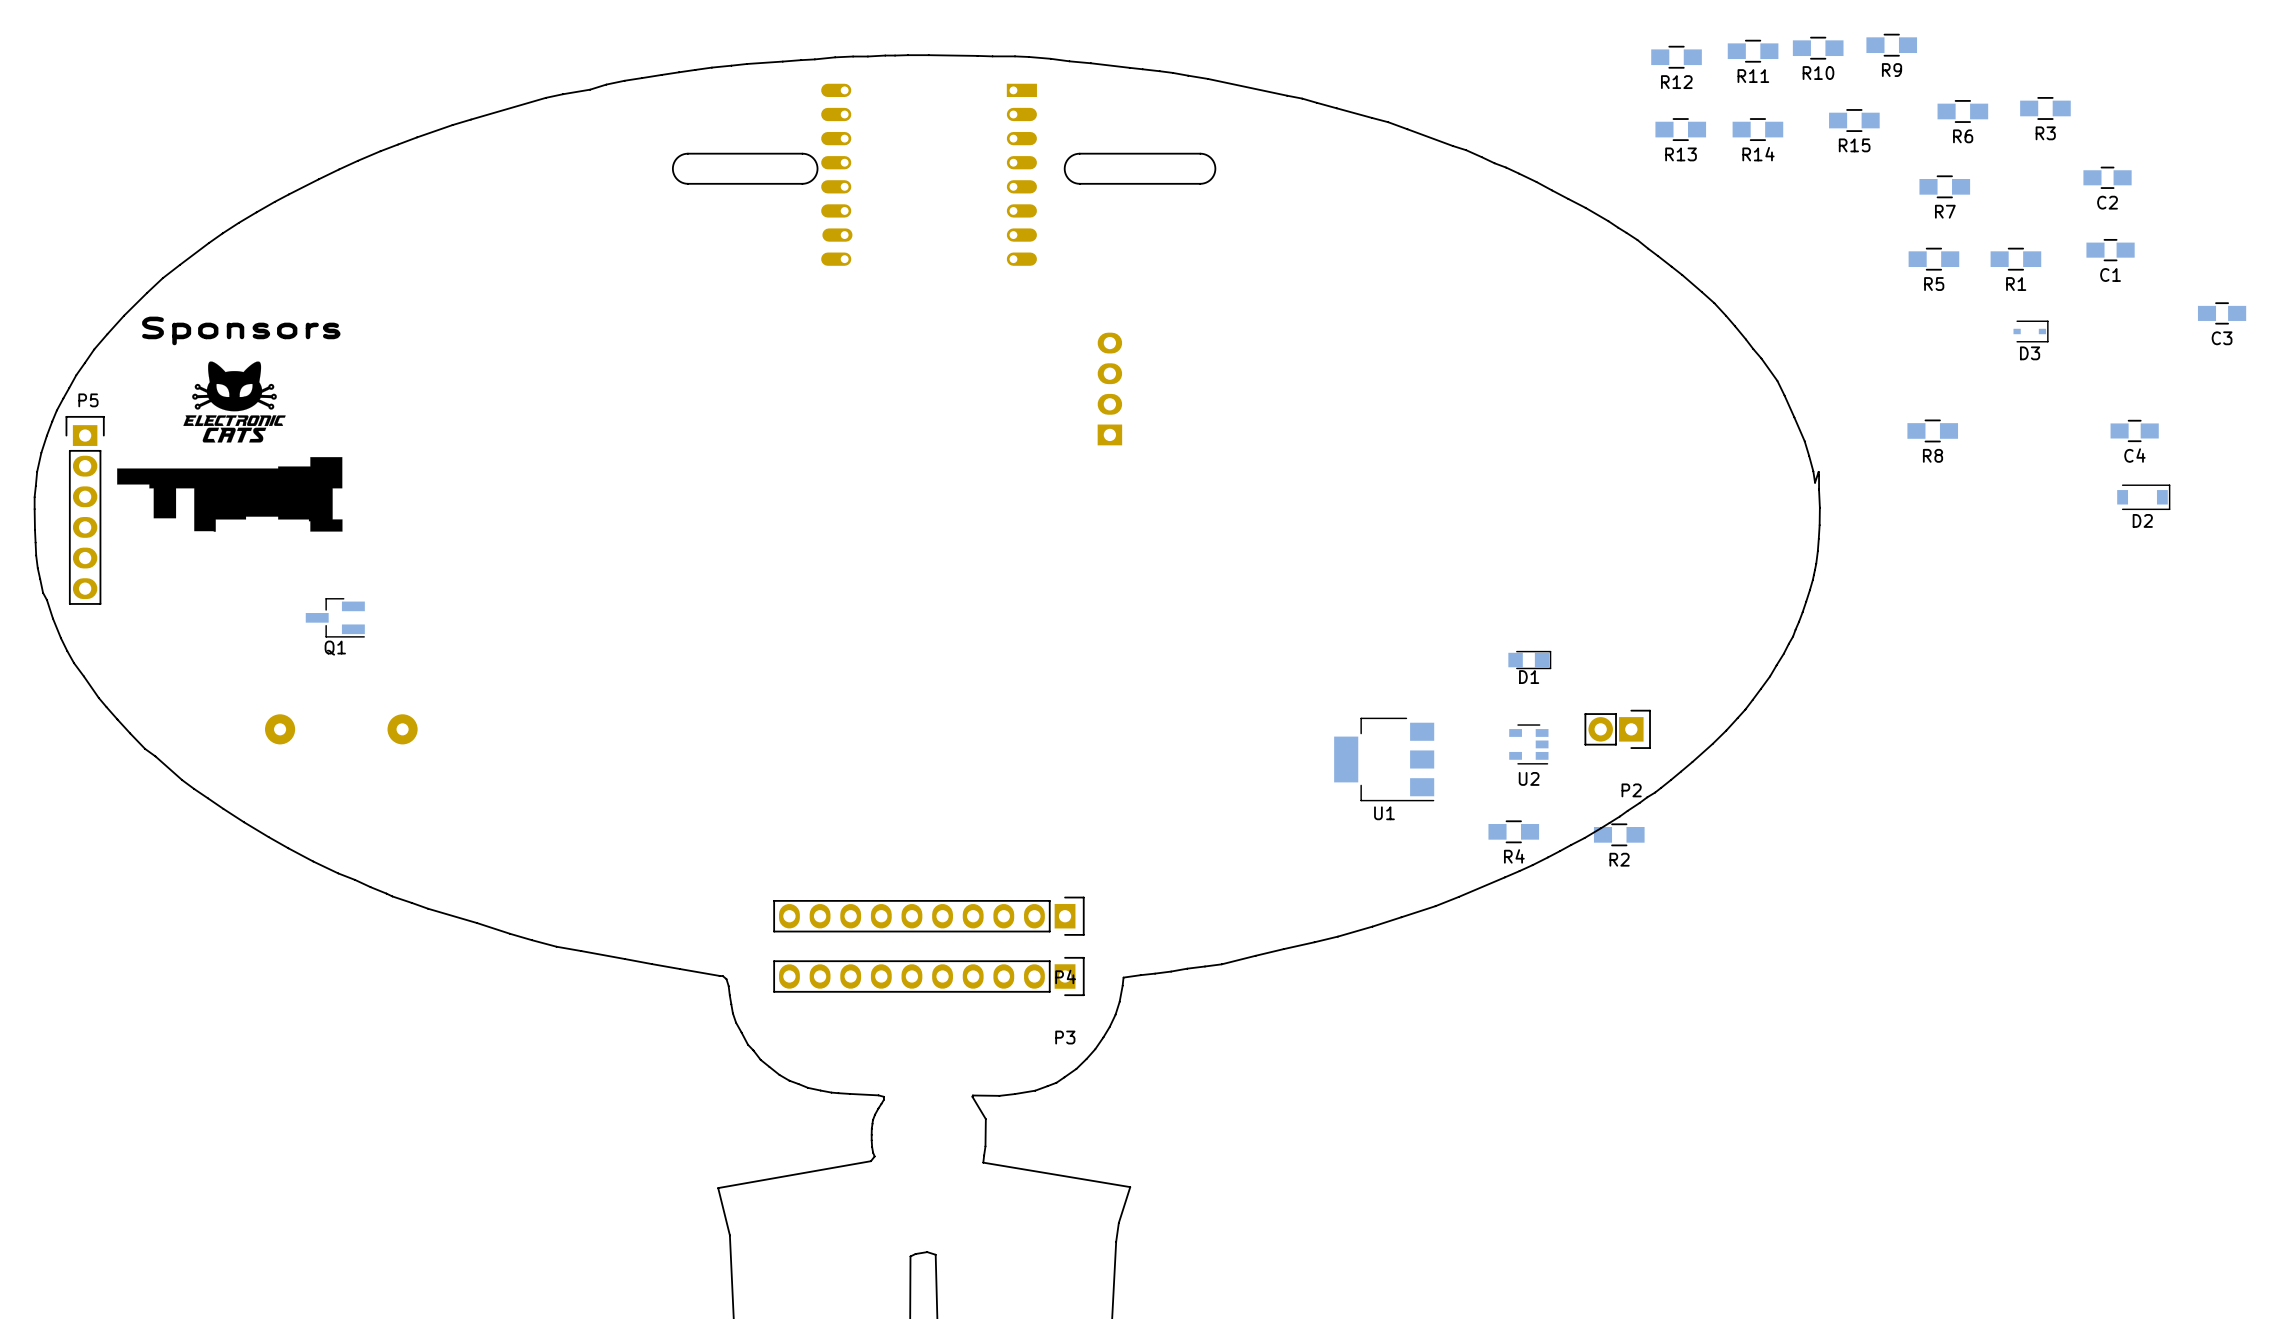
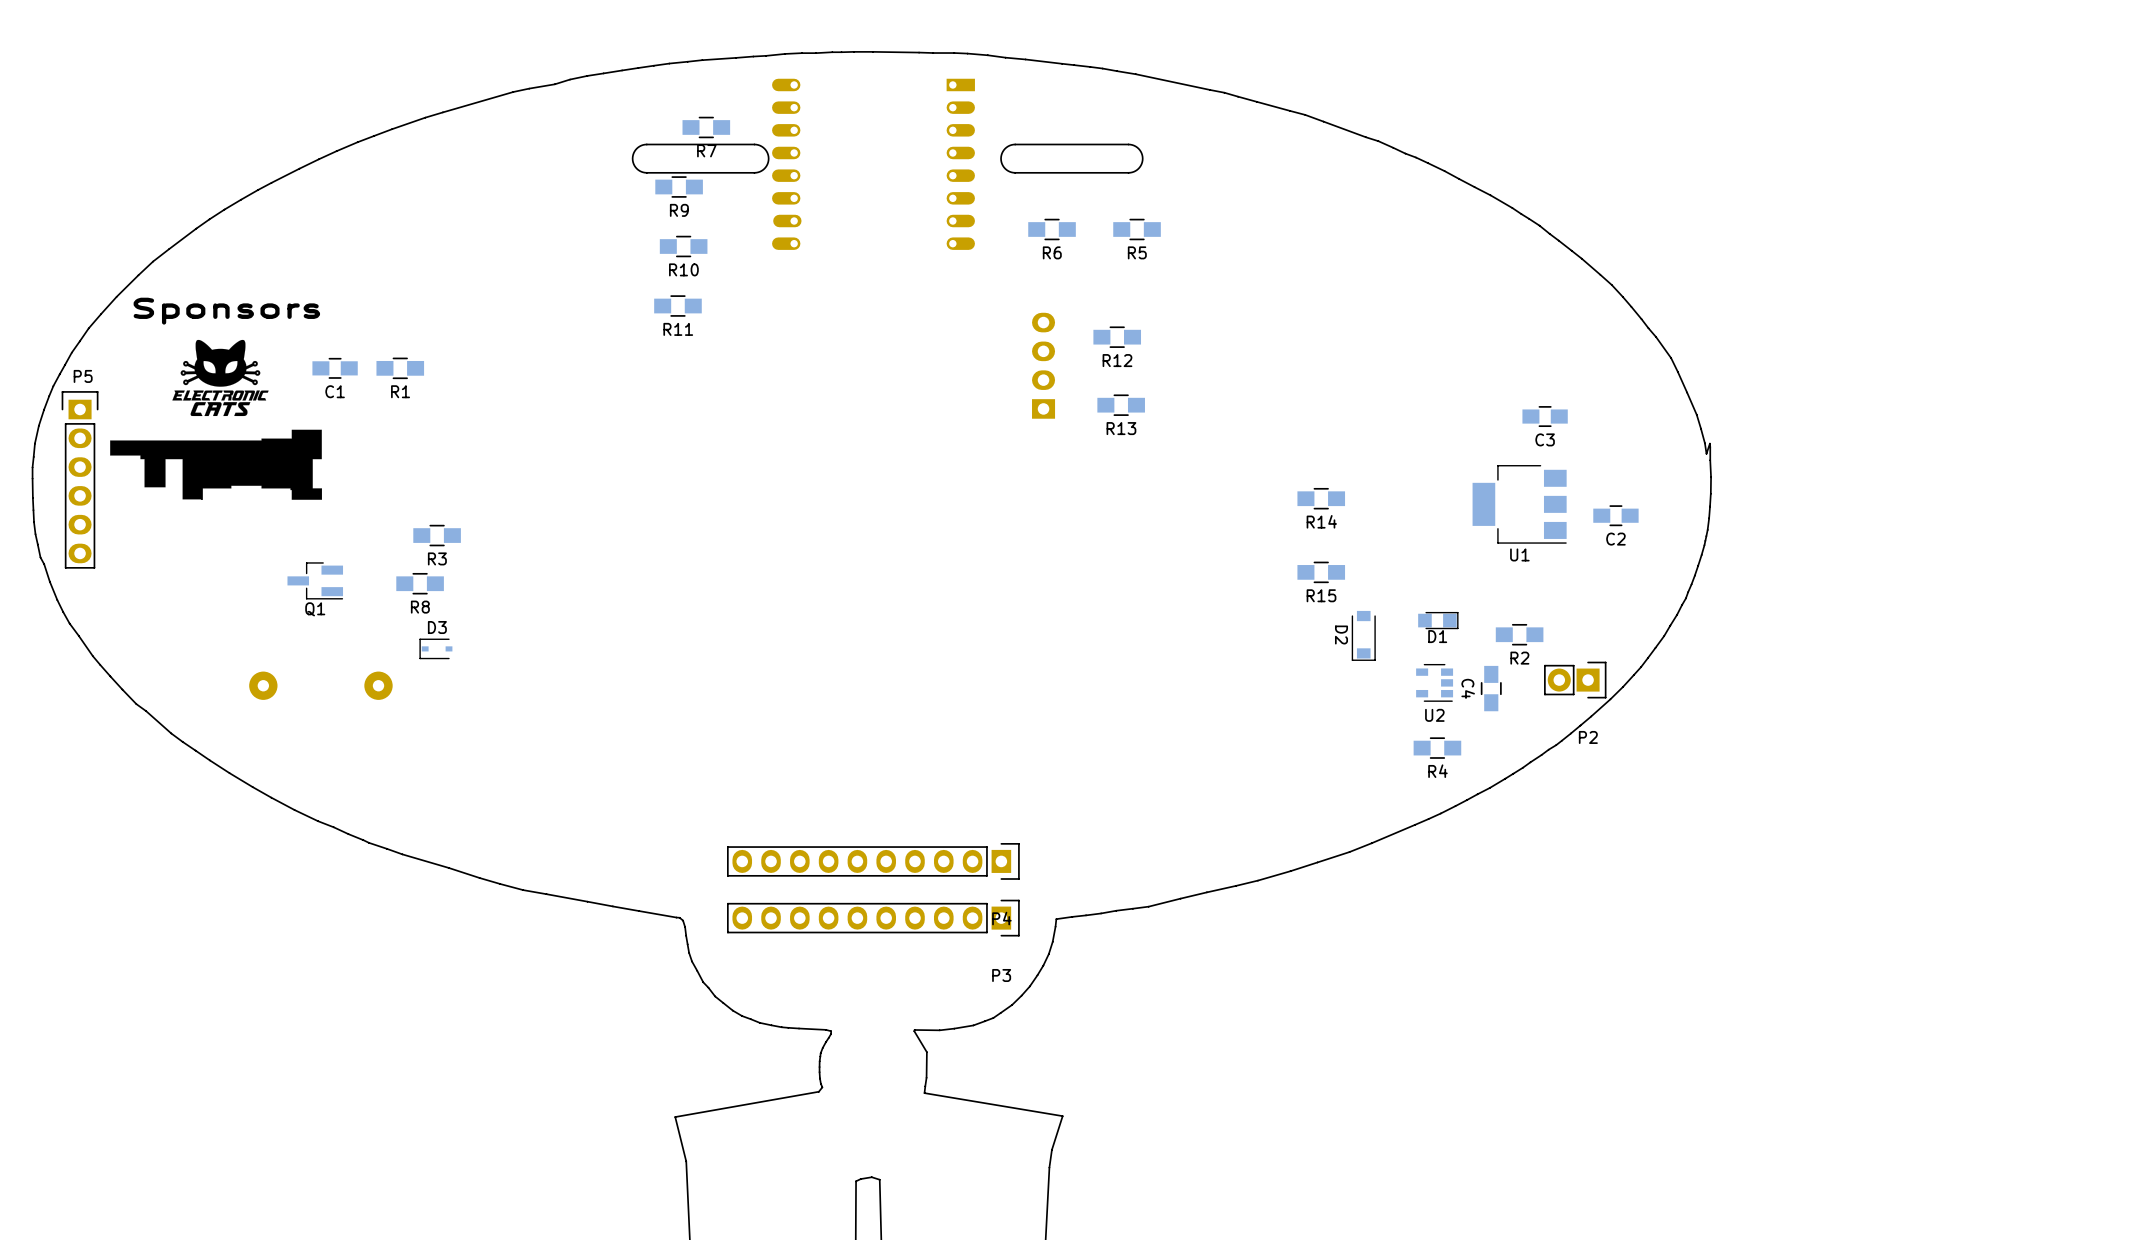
R9 position: (1891, 45) -> (679, 186)
R10 position: (1818, 48) -> (683, 246)
R11 position: (1753, 51) -> (677, 306)
R12 position: (1676, 57) -> (1117, 337)
R3 position: (2045, 108) -> (437, 535)
R6 position: (1962, 111) -> (1052, 229)
R15 position: (1854, 120) -> (1321, 572)
R13 position: (1680, 129) -> (1121, 405)
R14 position: (1757, 129) -> (1321, 498)
C2 position: (2107, 177) -> (1615, 515)
R7 position: (1944, 186) -> (706, 127)
C1 position: (2110, 250) -> (335, 368)
R5 position: (1933, 259) -> (1137, 229)
R1 position: (2015, 259) -> (400, 368)
C3 position: (2222, 313) -> (1545, 416)
D3 rotation: 0° (2031, 331) -> 180° (435, 648)
D3 position: (2031, 331) -> (435, 648)
R8 position: (1932, 430) -> (420, 583)
C4 rotation: 0° (2134, 430) -> 90° clockwise (1491, 688)
C4 position: (2134, 430) -> (1491, 688)
D2 rotation: 0° (2143, 497) -> 90° clockwise (1363, 635)
D2 position: (2143, 497) -> (1363, 635)
P2 position: (1617, 729) -> (1575, 680)
U2 position: (1528, 744) -> (1434, 682)
U1 position: (1384, 759) -> (1519, 504)
R4 position: (1513, 831) -> (1437, 748)
R2 position: (1619, 834) -> (1519, 634)

